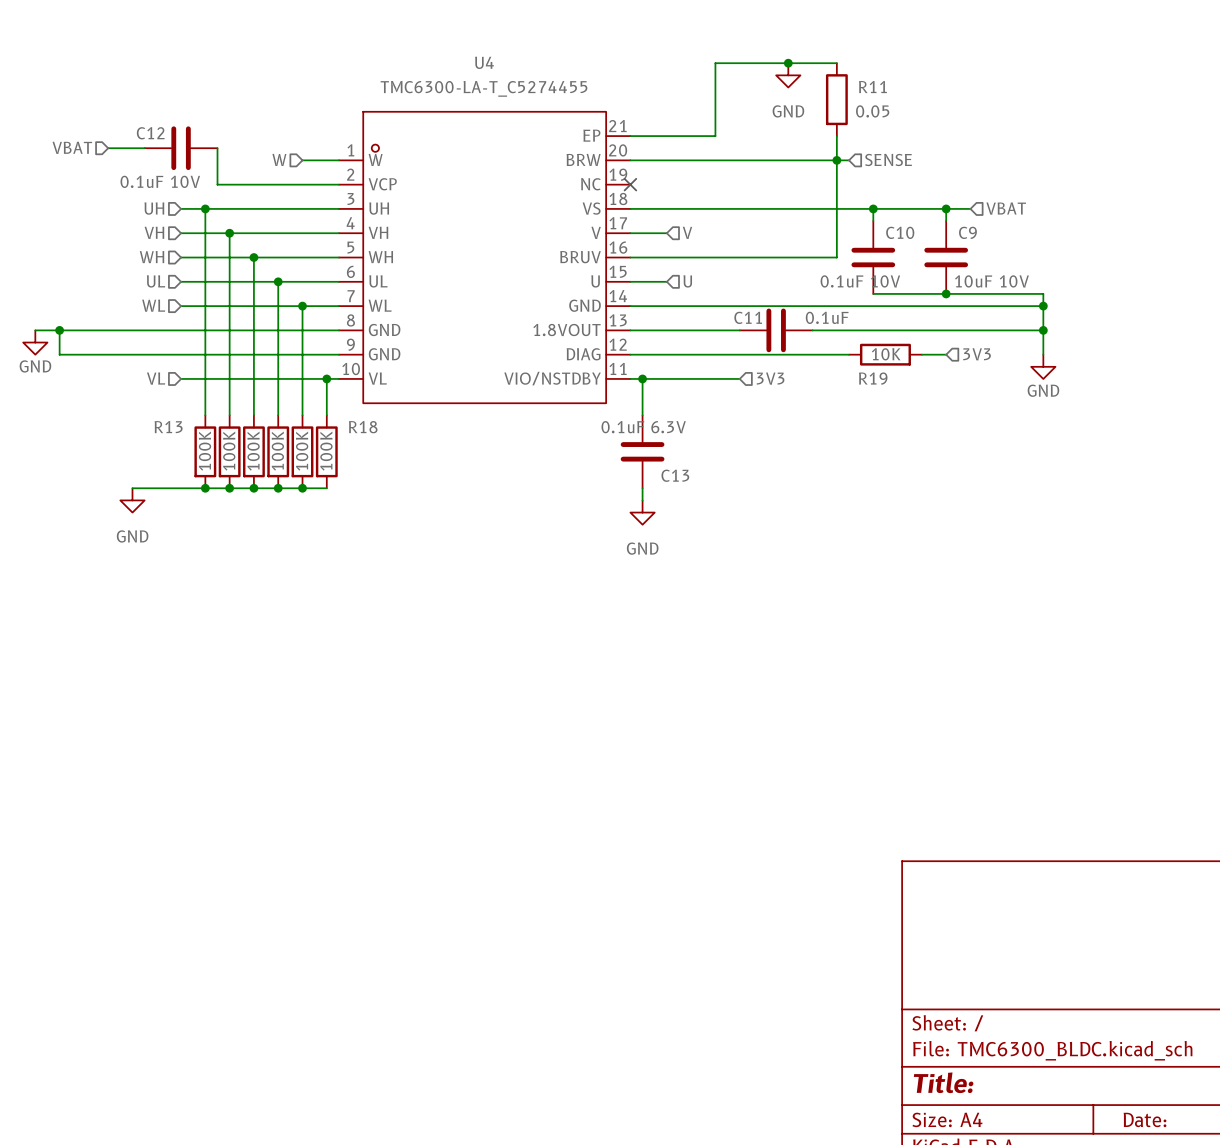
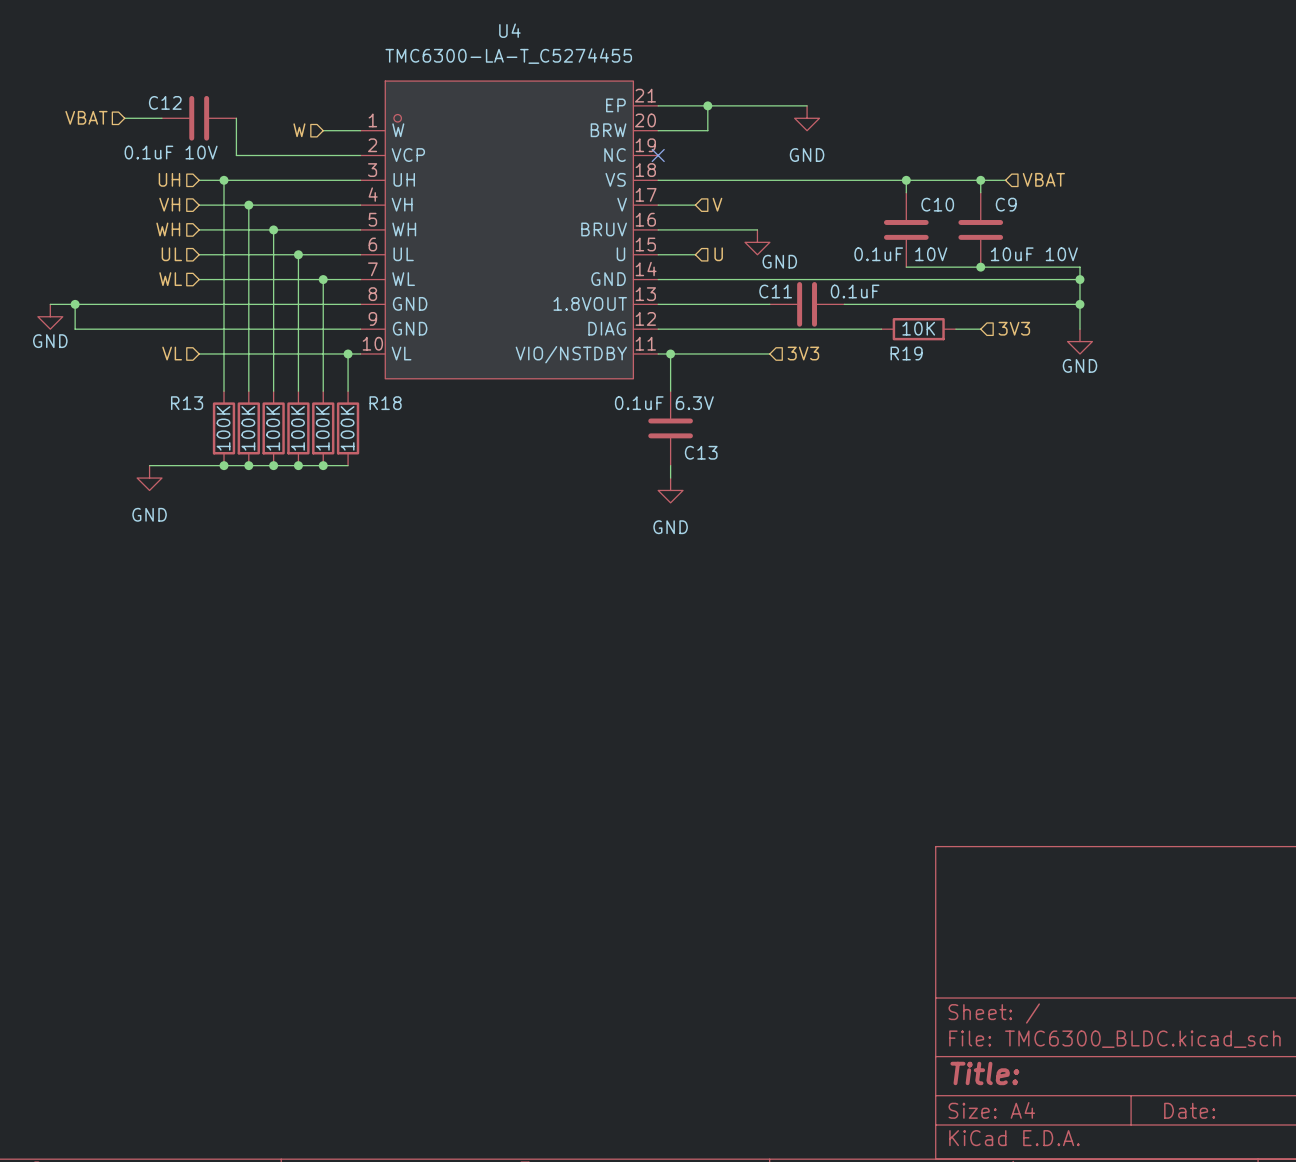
junction: (788, 63) -> none
wire: (836, 63) (715, 63) (715, 136) -> (807, 105) (745, 105)
power symbol position: GND (788, 75) -> GND (807, 118)
R11: 0.05 (836, 99) -> none
junction: none -> (707, 105)
wire: (836, 136) (836, 257) (727, 257) -> none
hierarchical label: SENSE (888, 159) -> none
wire: (679, 160) (849, 160) -> (707, 130) (707, 105)
junction: (836, 160) -> none
power symbol: none -> GND (757, 242)

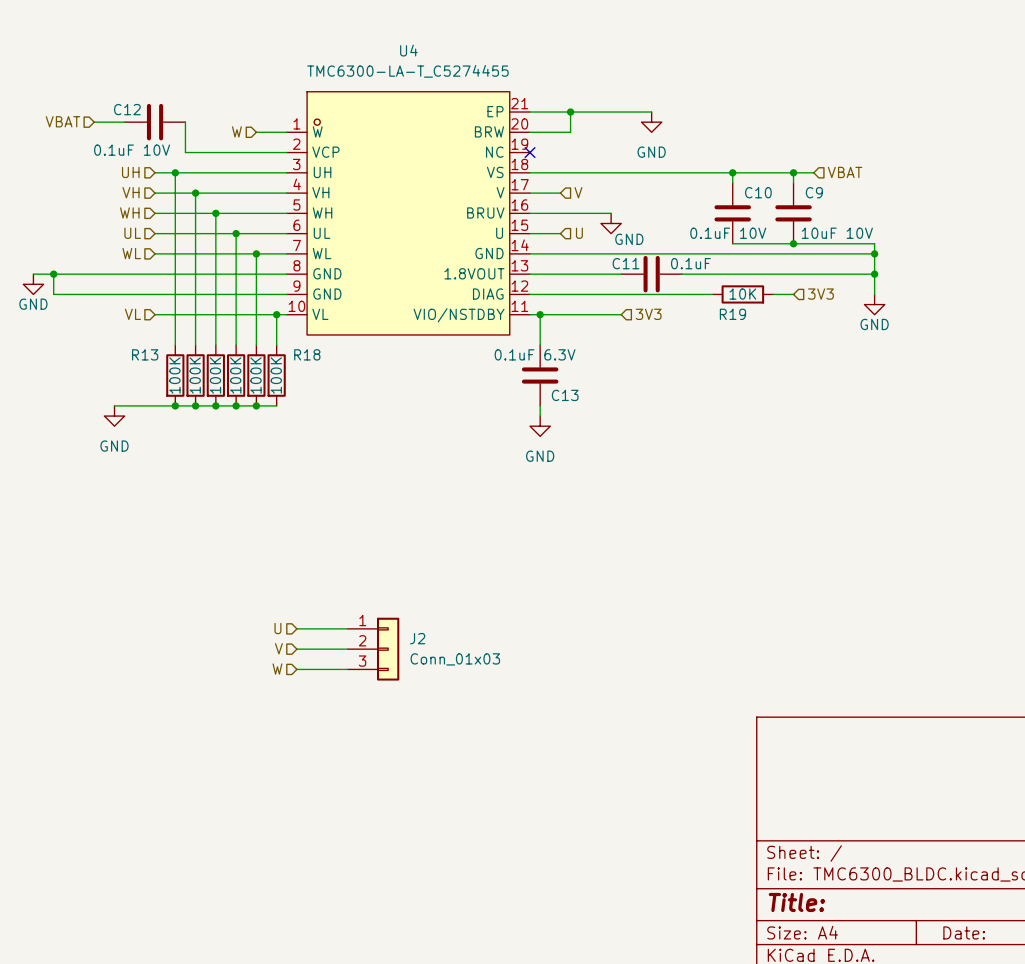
hierarchical label: none -> U (277, 628)
wire: none -> (296, 628) (347, 628)
hierarchical label: none -> V (278, 648)
wire: none -> (296, 649) (347, 649)
J2: none -> Conn_01x03 (373, 649)
hierarchical label: none -> W (277, 669)
wire: none -> (296, 669) (347, 669)

